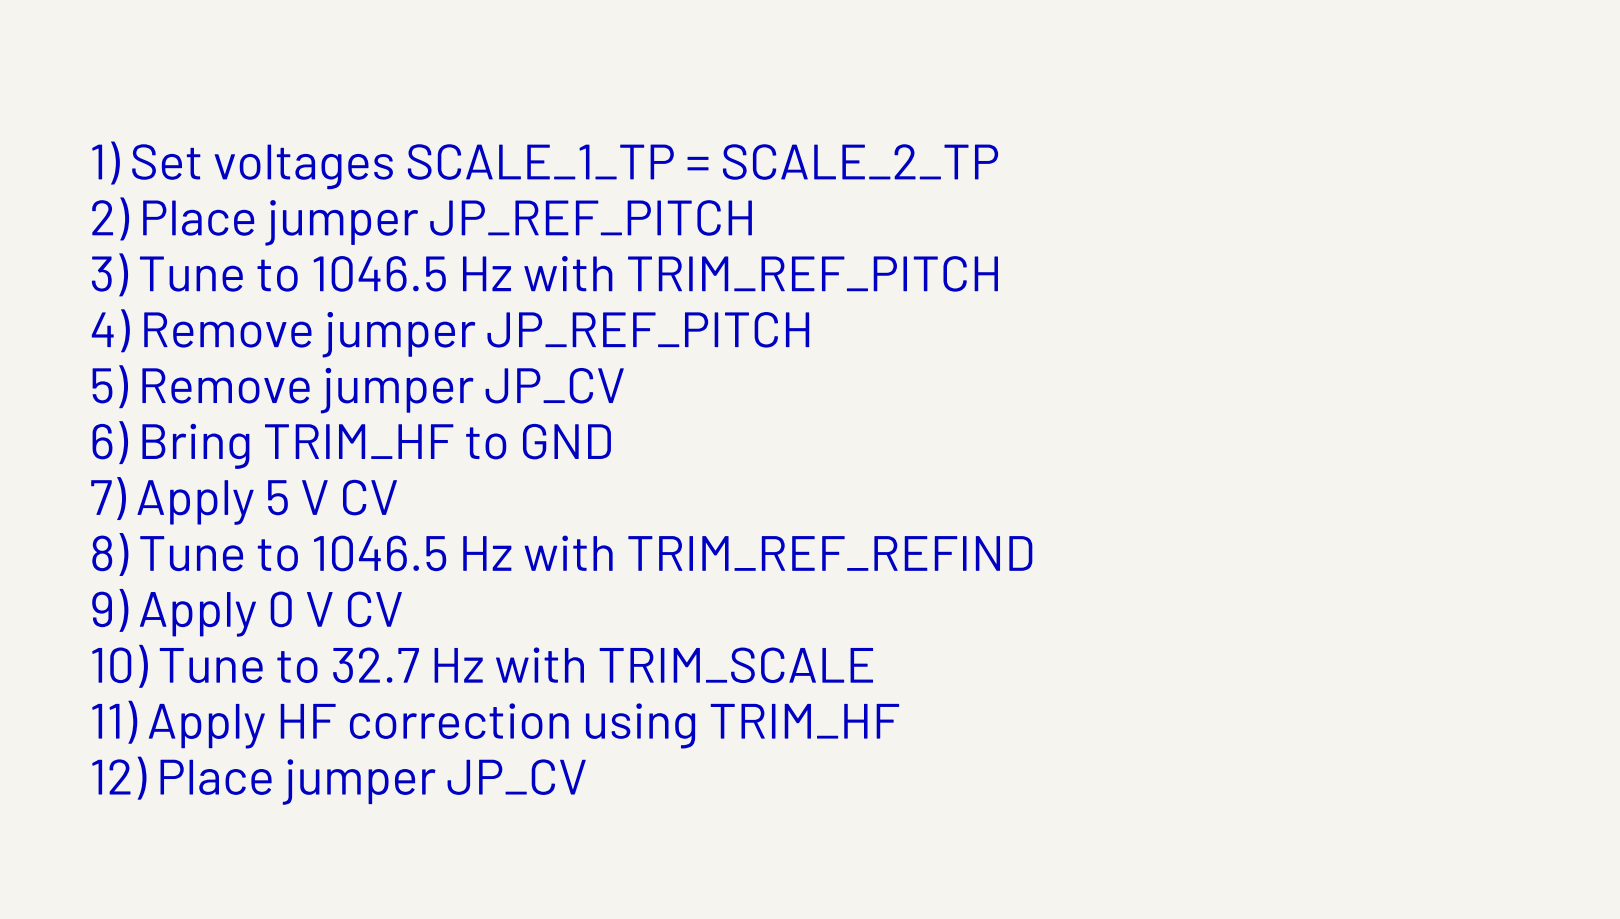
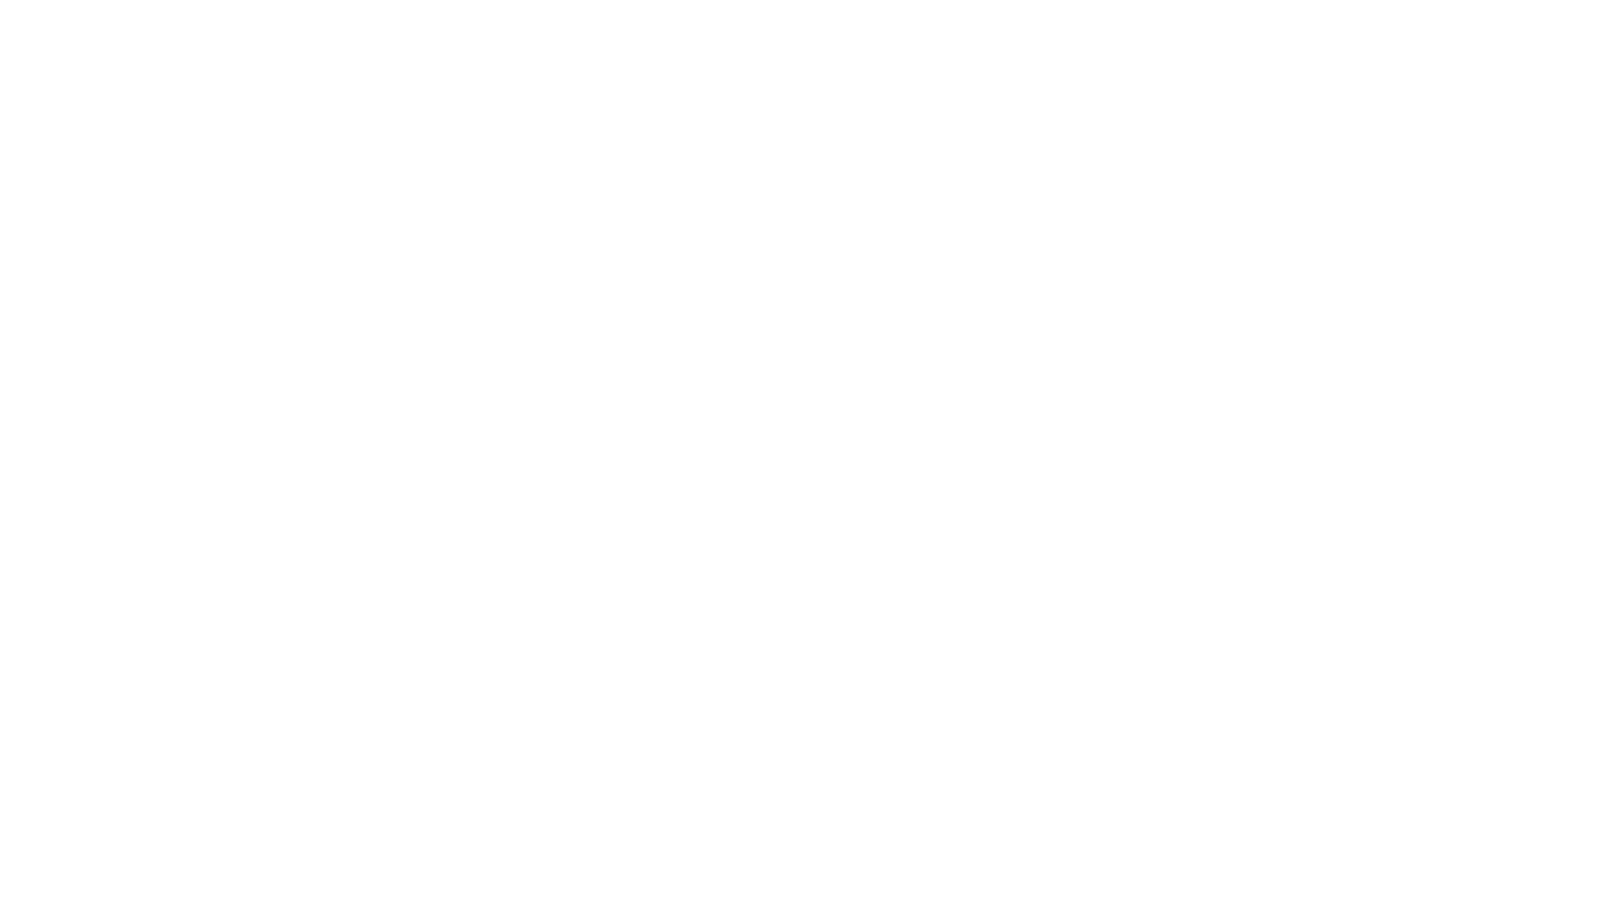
text: 1) Set voltages SCALE_1_TP = SCALE_2_TP (545, 165) -> none
text: 2) Place jumper JP_REF_PITCH (422, 221) -> none
text: 3) Tune to 1046.5 Hz with TRIM_REF_PITCH (544, 274) -> none
text: 4) Remove jumper JP_REF_PITCH (450, 333) -> none
text: 5) Remove jumper JP_CV (358, 389) -> none
text: 6) Bring TRIM_HF to GND (351, 444) -> none
text: 7) Apply 5 V CV (244, 500) -> none
text: 8) Tune to 1046.5 Hz with TRIM_REF_REFIND (562, 554) -> none
text: 9) Apply 0 V CV (247, 612) -> none
text: 10) Tune to 32.7 Hz with TRIM_SCALE (482, 666) -> none
text: 11) Apply HF correction using TRIM_HF (495, 724) -> none
text: 12) Place jumper JP_CV (339, 780) -> none

